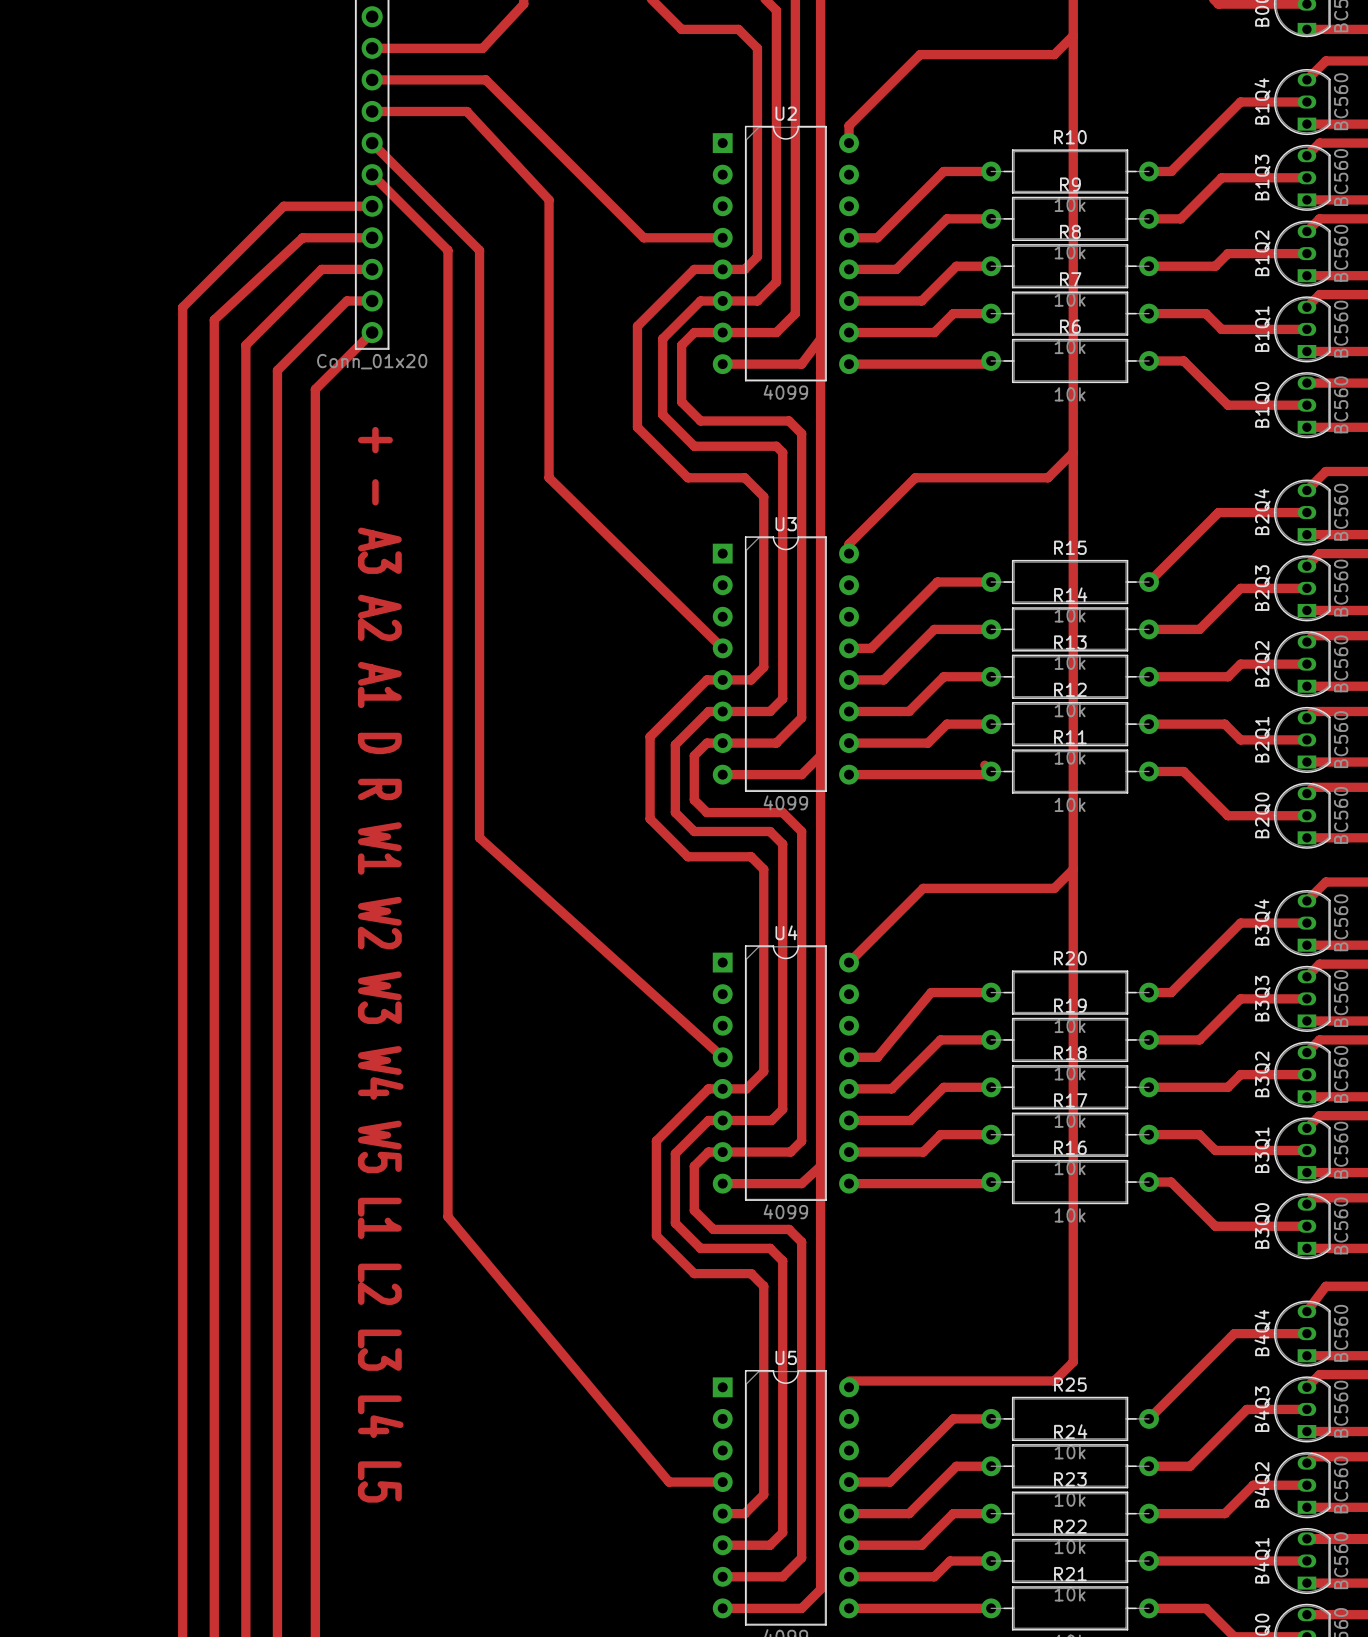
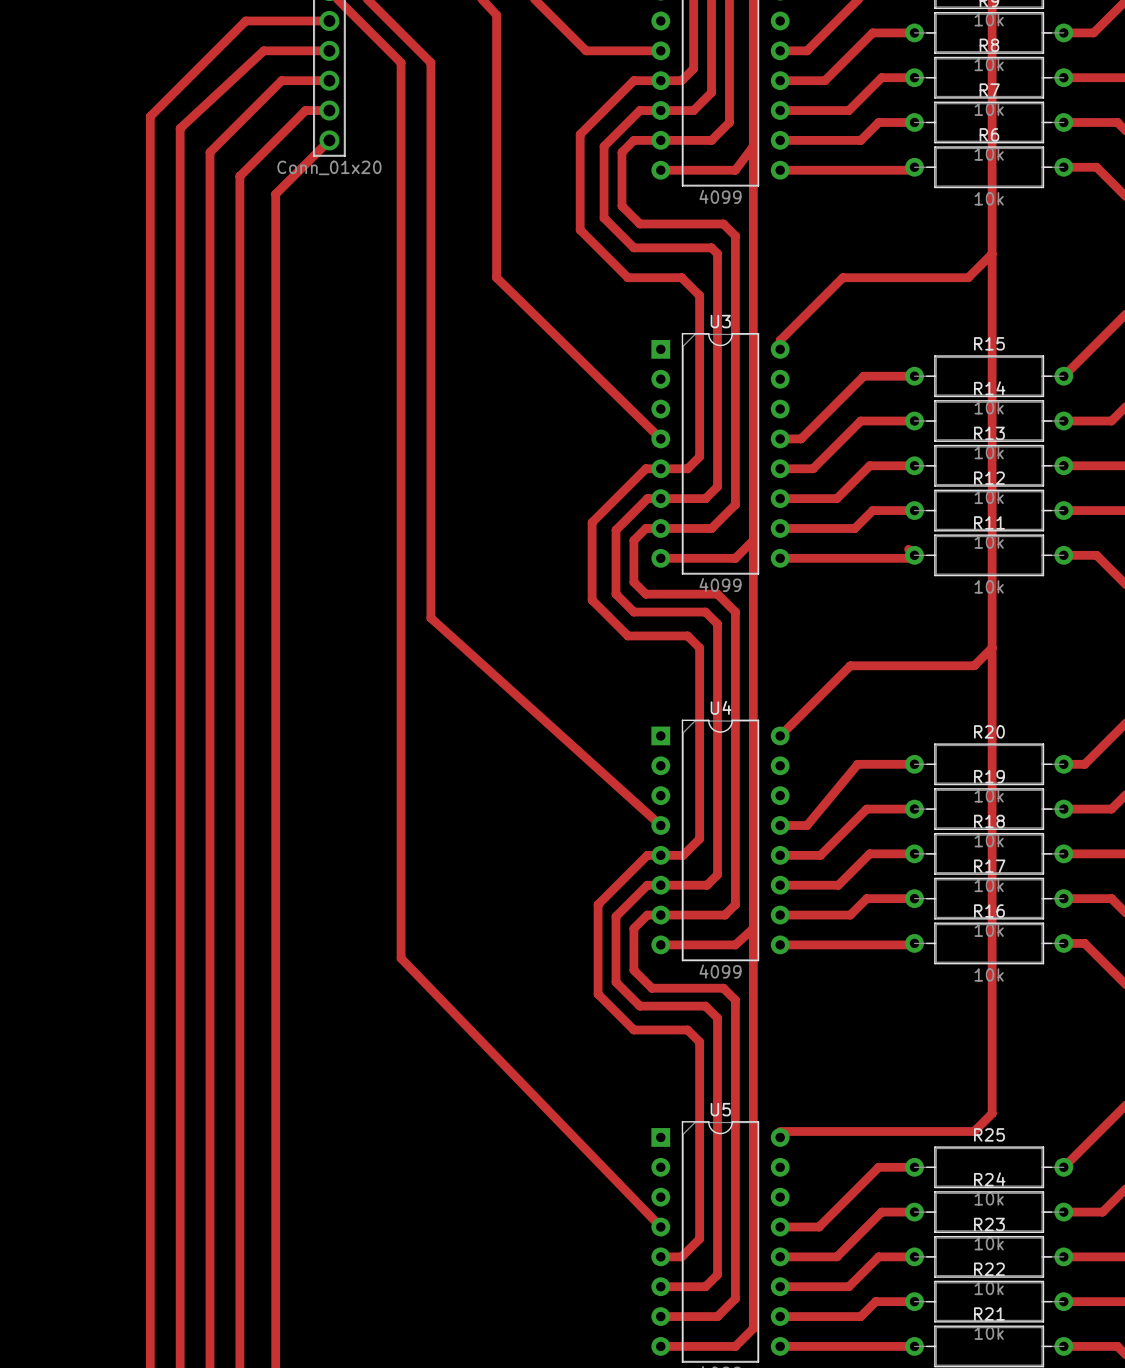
text: + - A3 A2 A1 D R W1 W2 W3 W4 W5 L1 L2 L3 L4 L5 (380, 964) -> none
track: (447, 1197) (447, 1216) (669, 1482) (722, 1482) -> (401, 958) (660, 1227)

